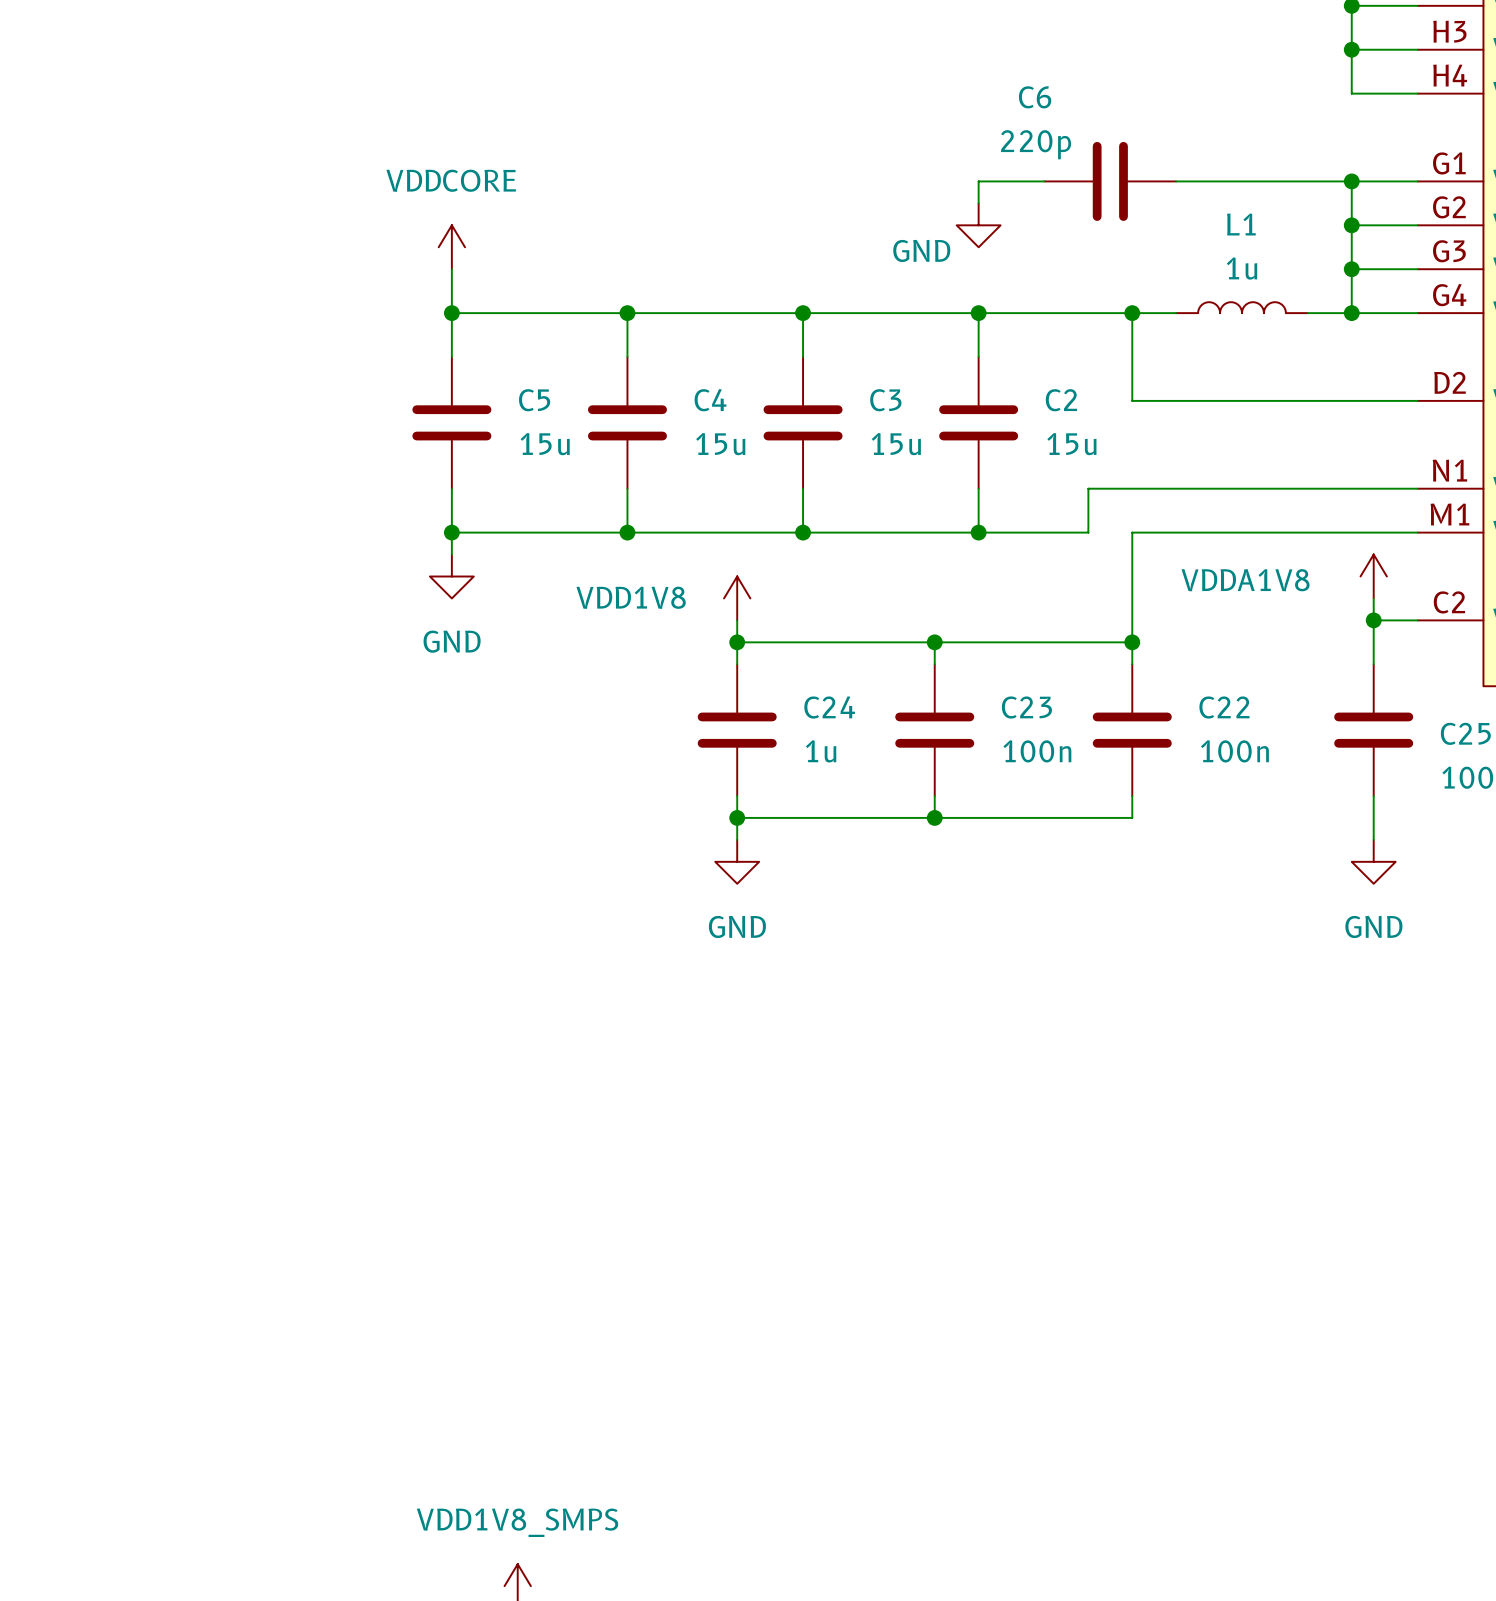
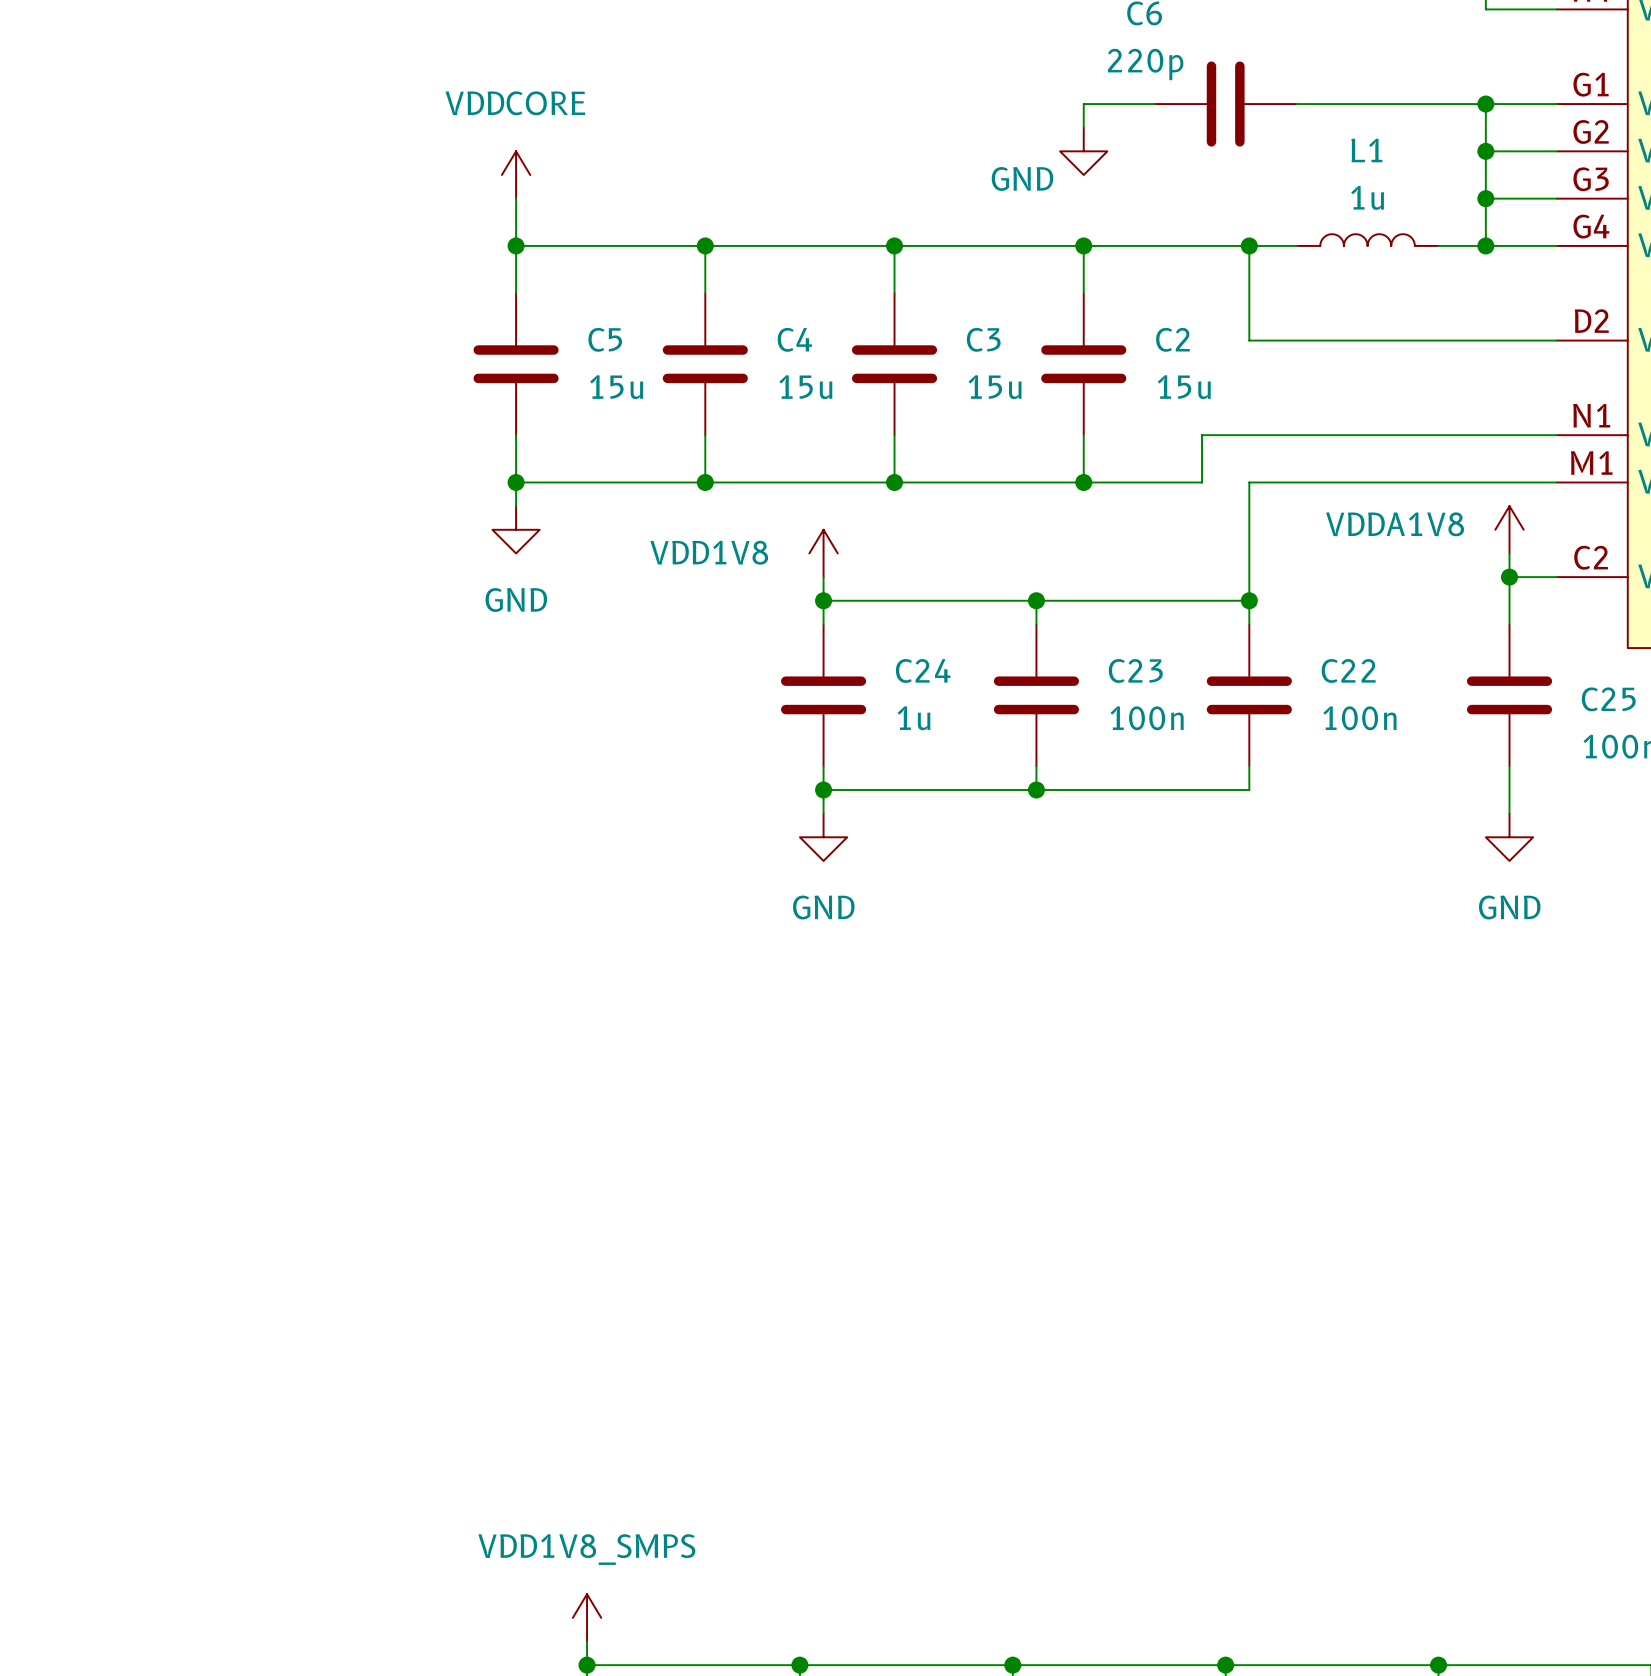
power symbol text position: VDDA1V8 (1245, 580) -> VDDA1V8 (1395, 524)

